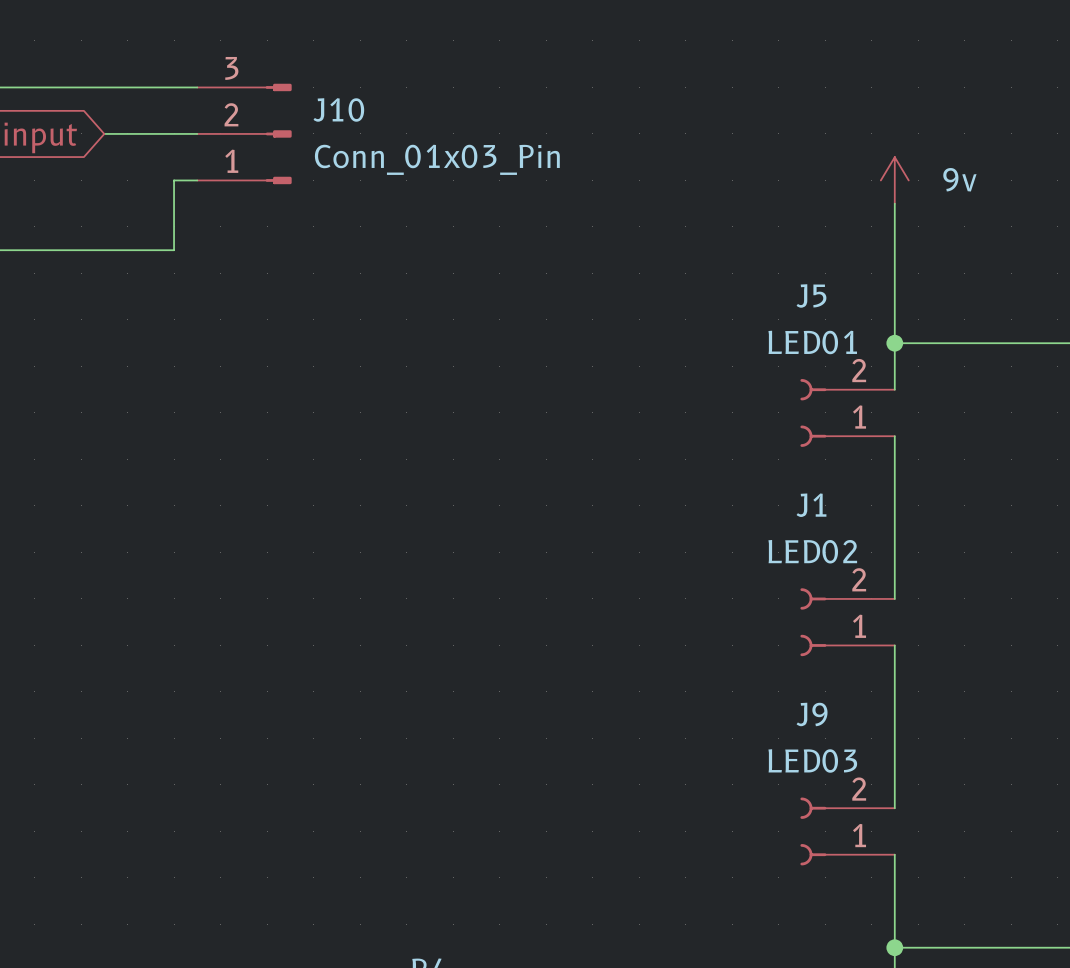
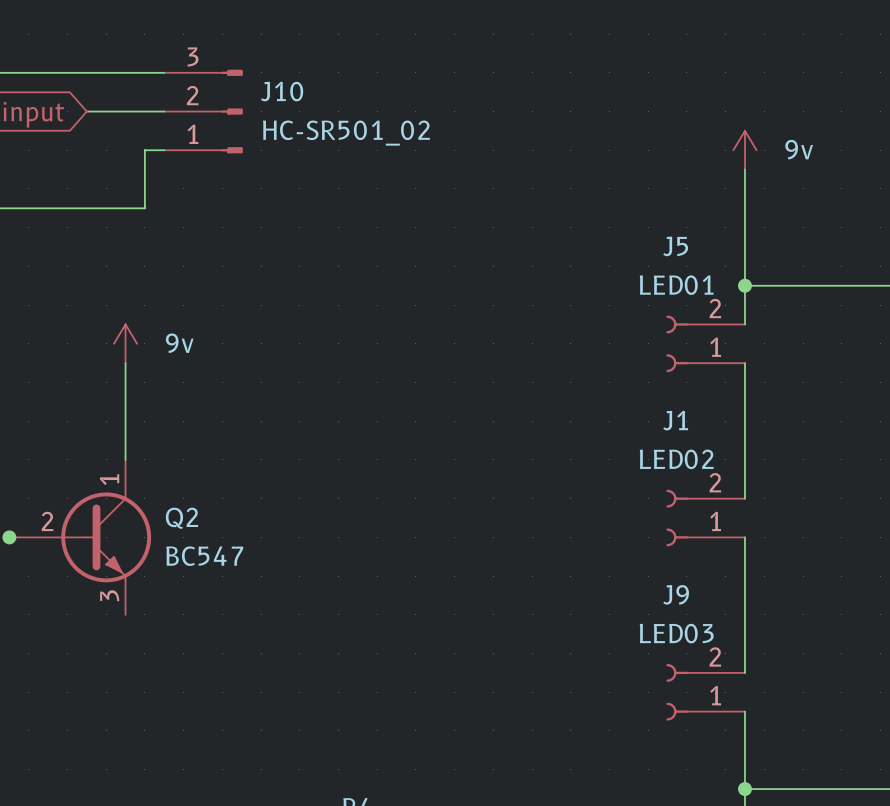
J10 value: Conn_01x03_Pin (437, 159) -> HC-SR501_02 (346, 133)
power symbol: none -> 9v (125, 343)
wire: none -> (125, 363) (125, 459)
junction: none -> (9, 537)
Q2: none -> BC547 (80, 537)

